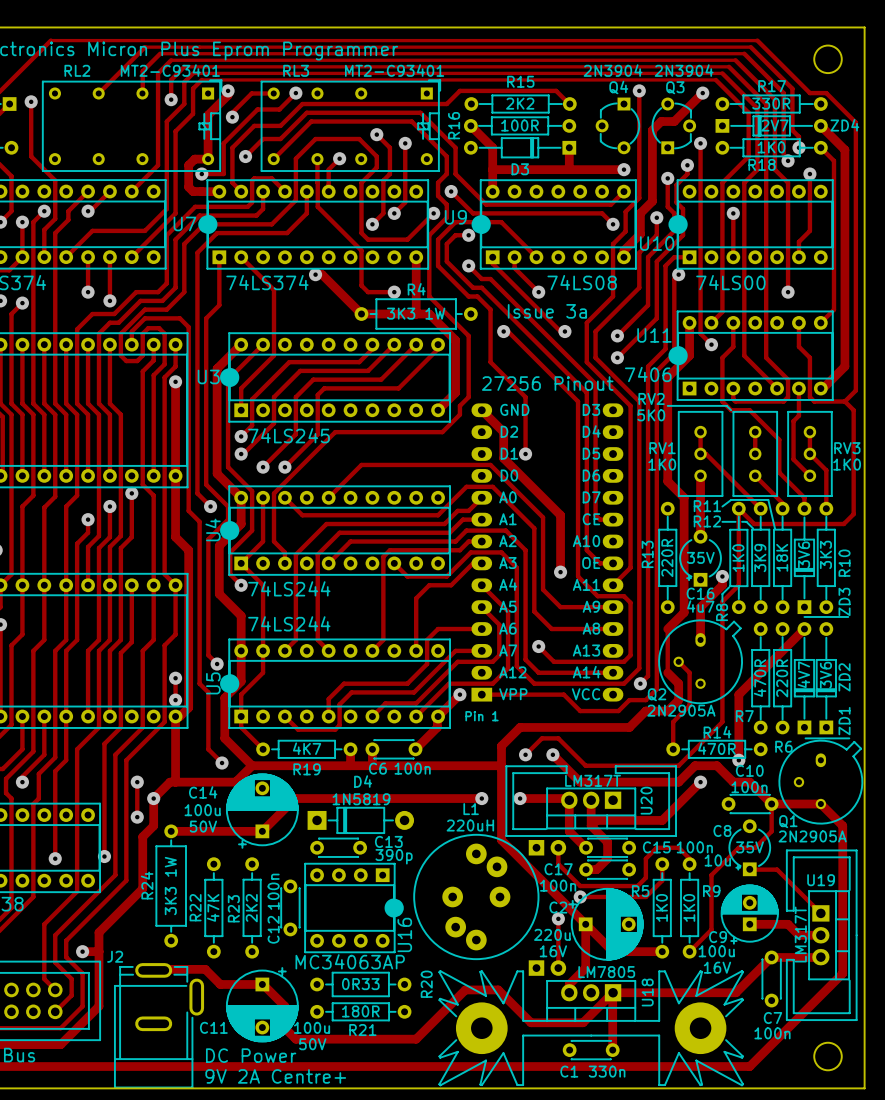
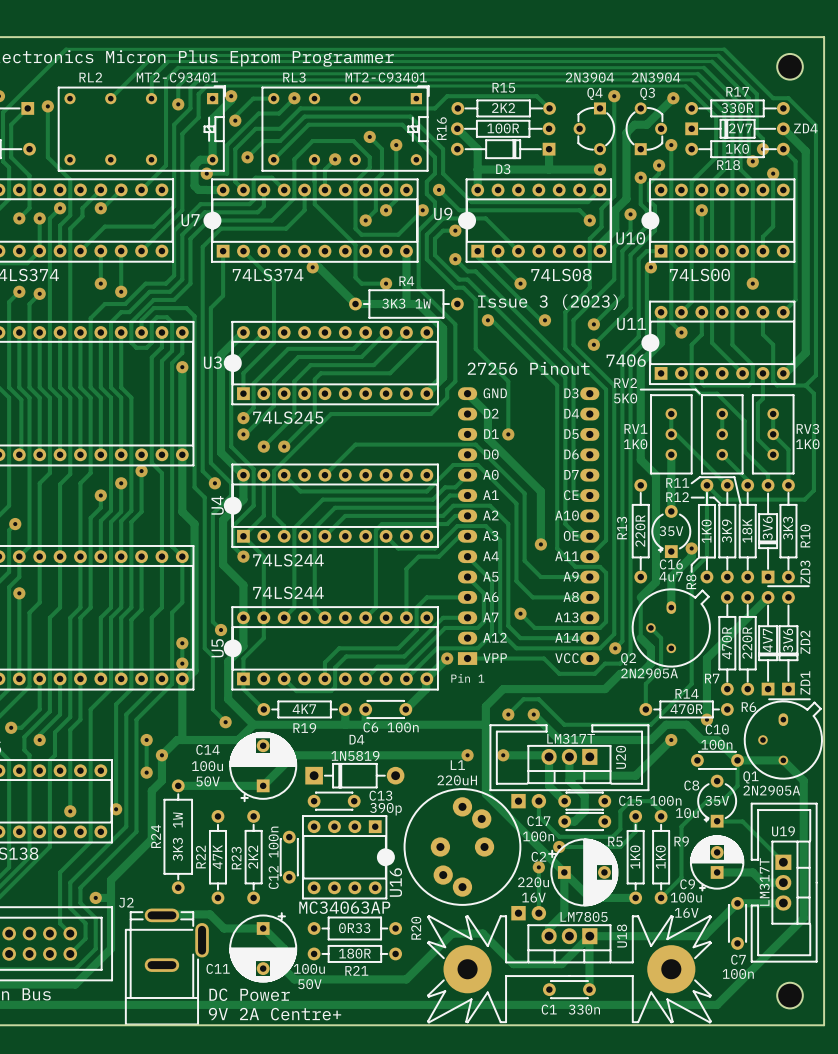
text: Issue 3a (547, 311) -> Issue 3 (2023) (548, 302)

